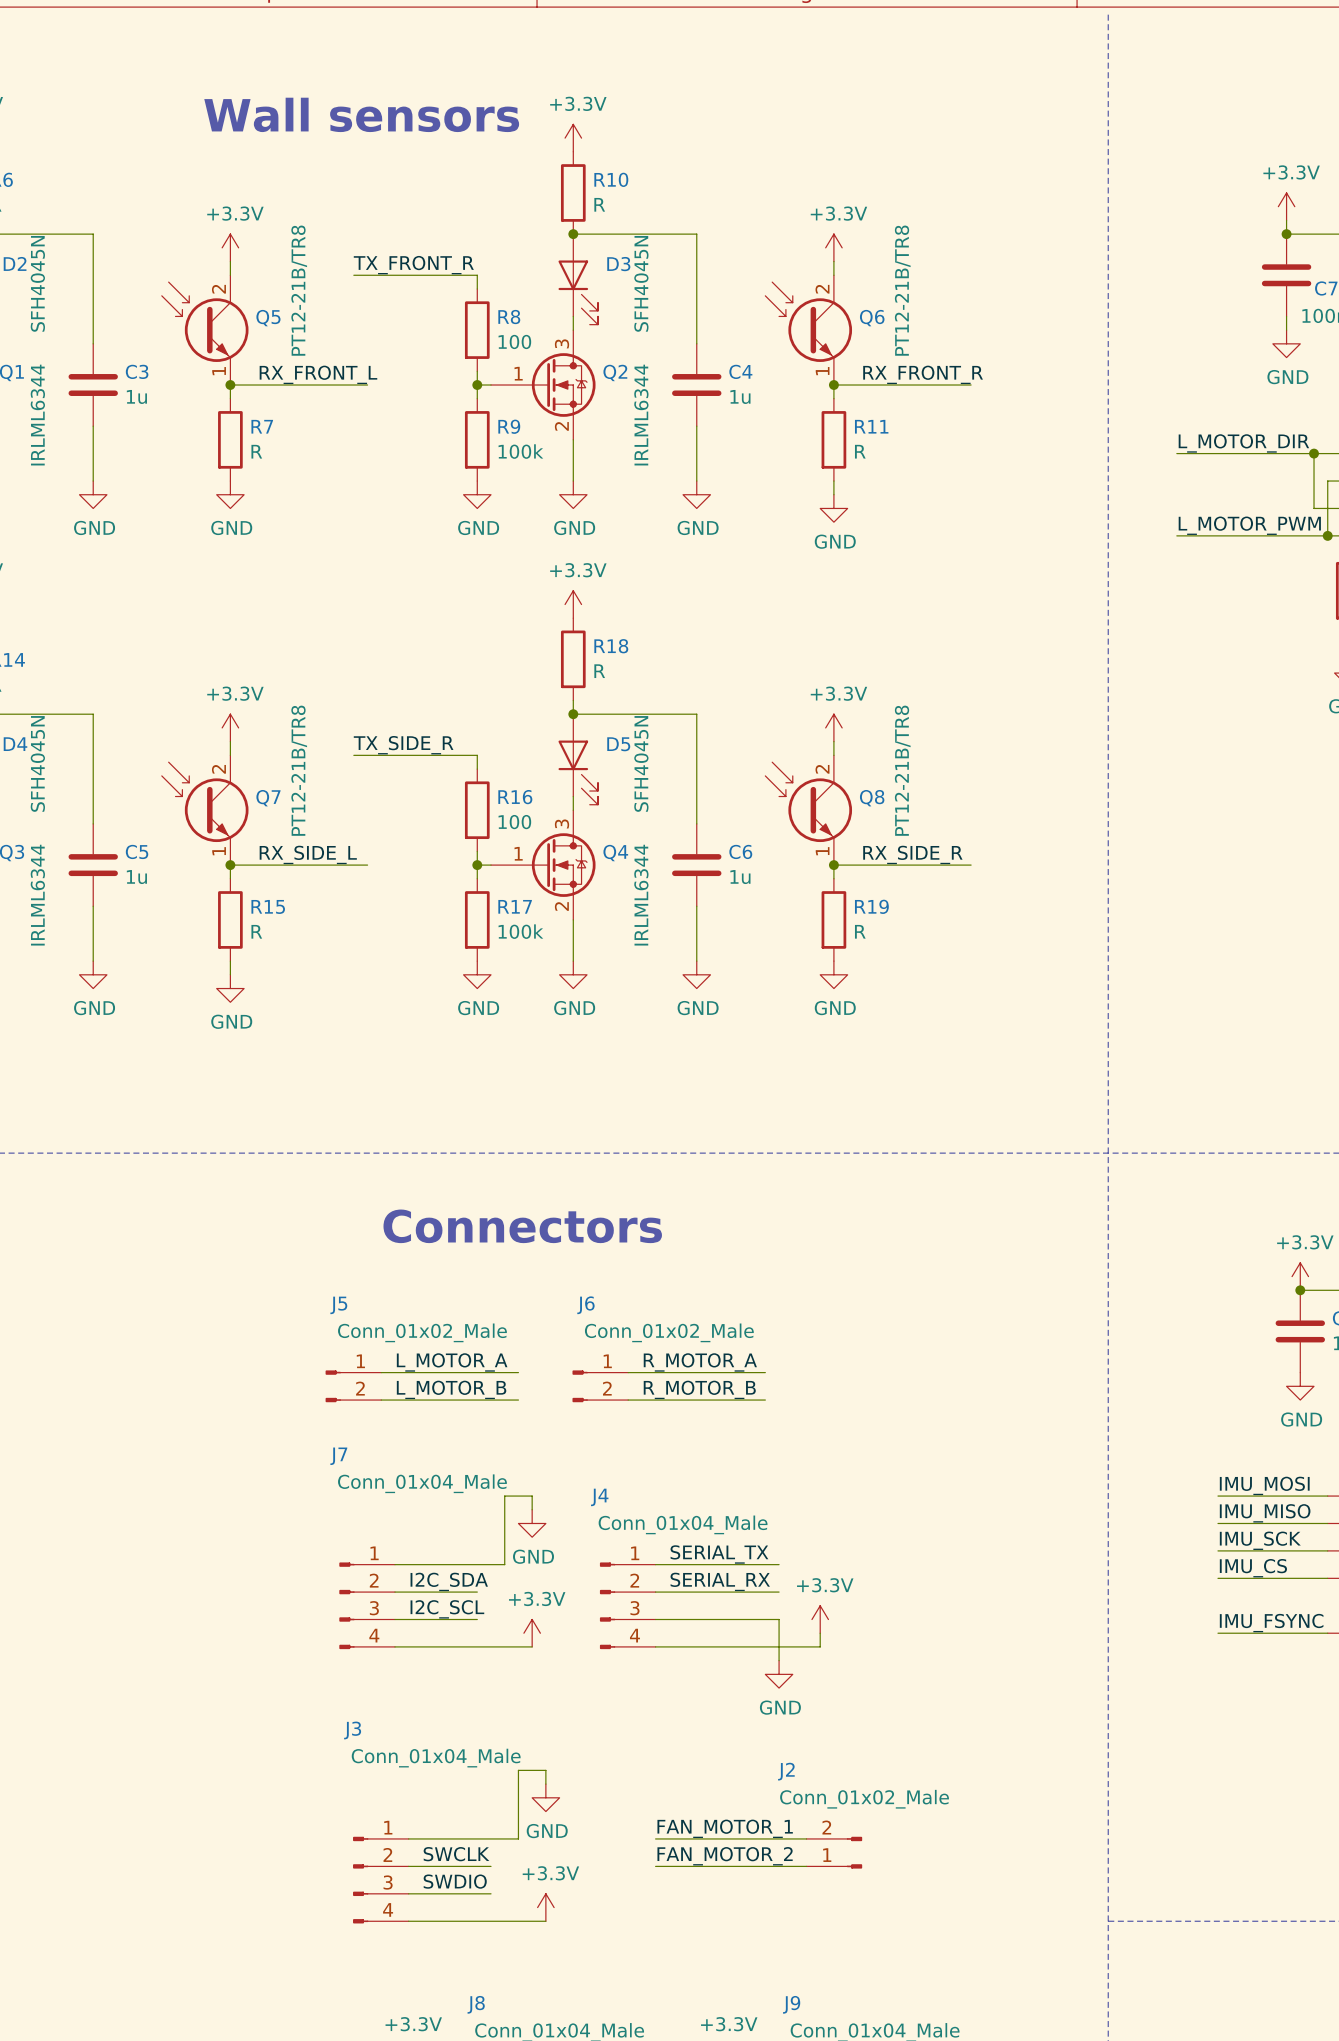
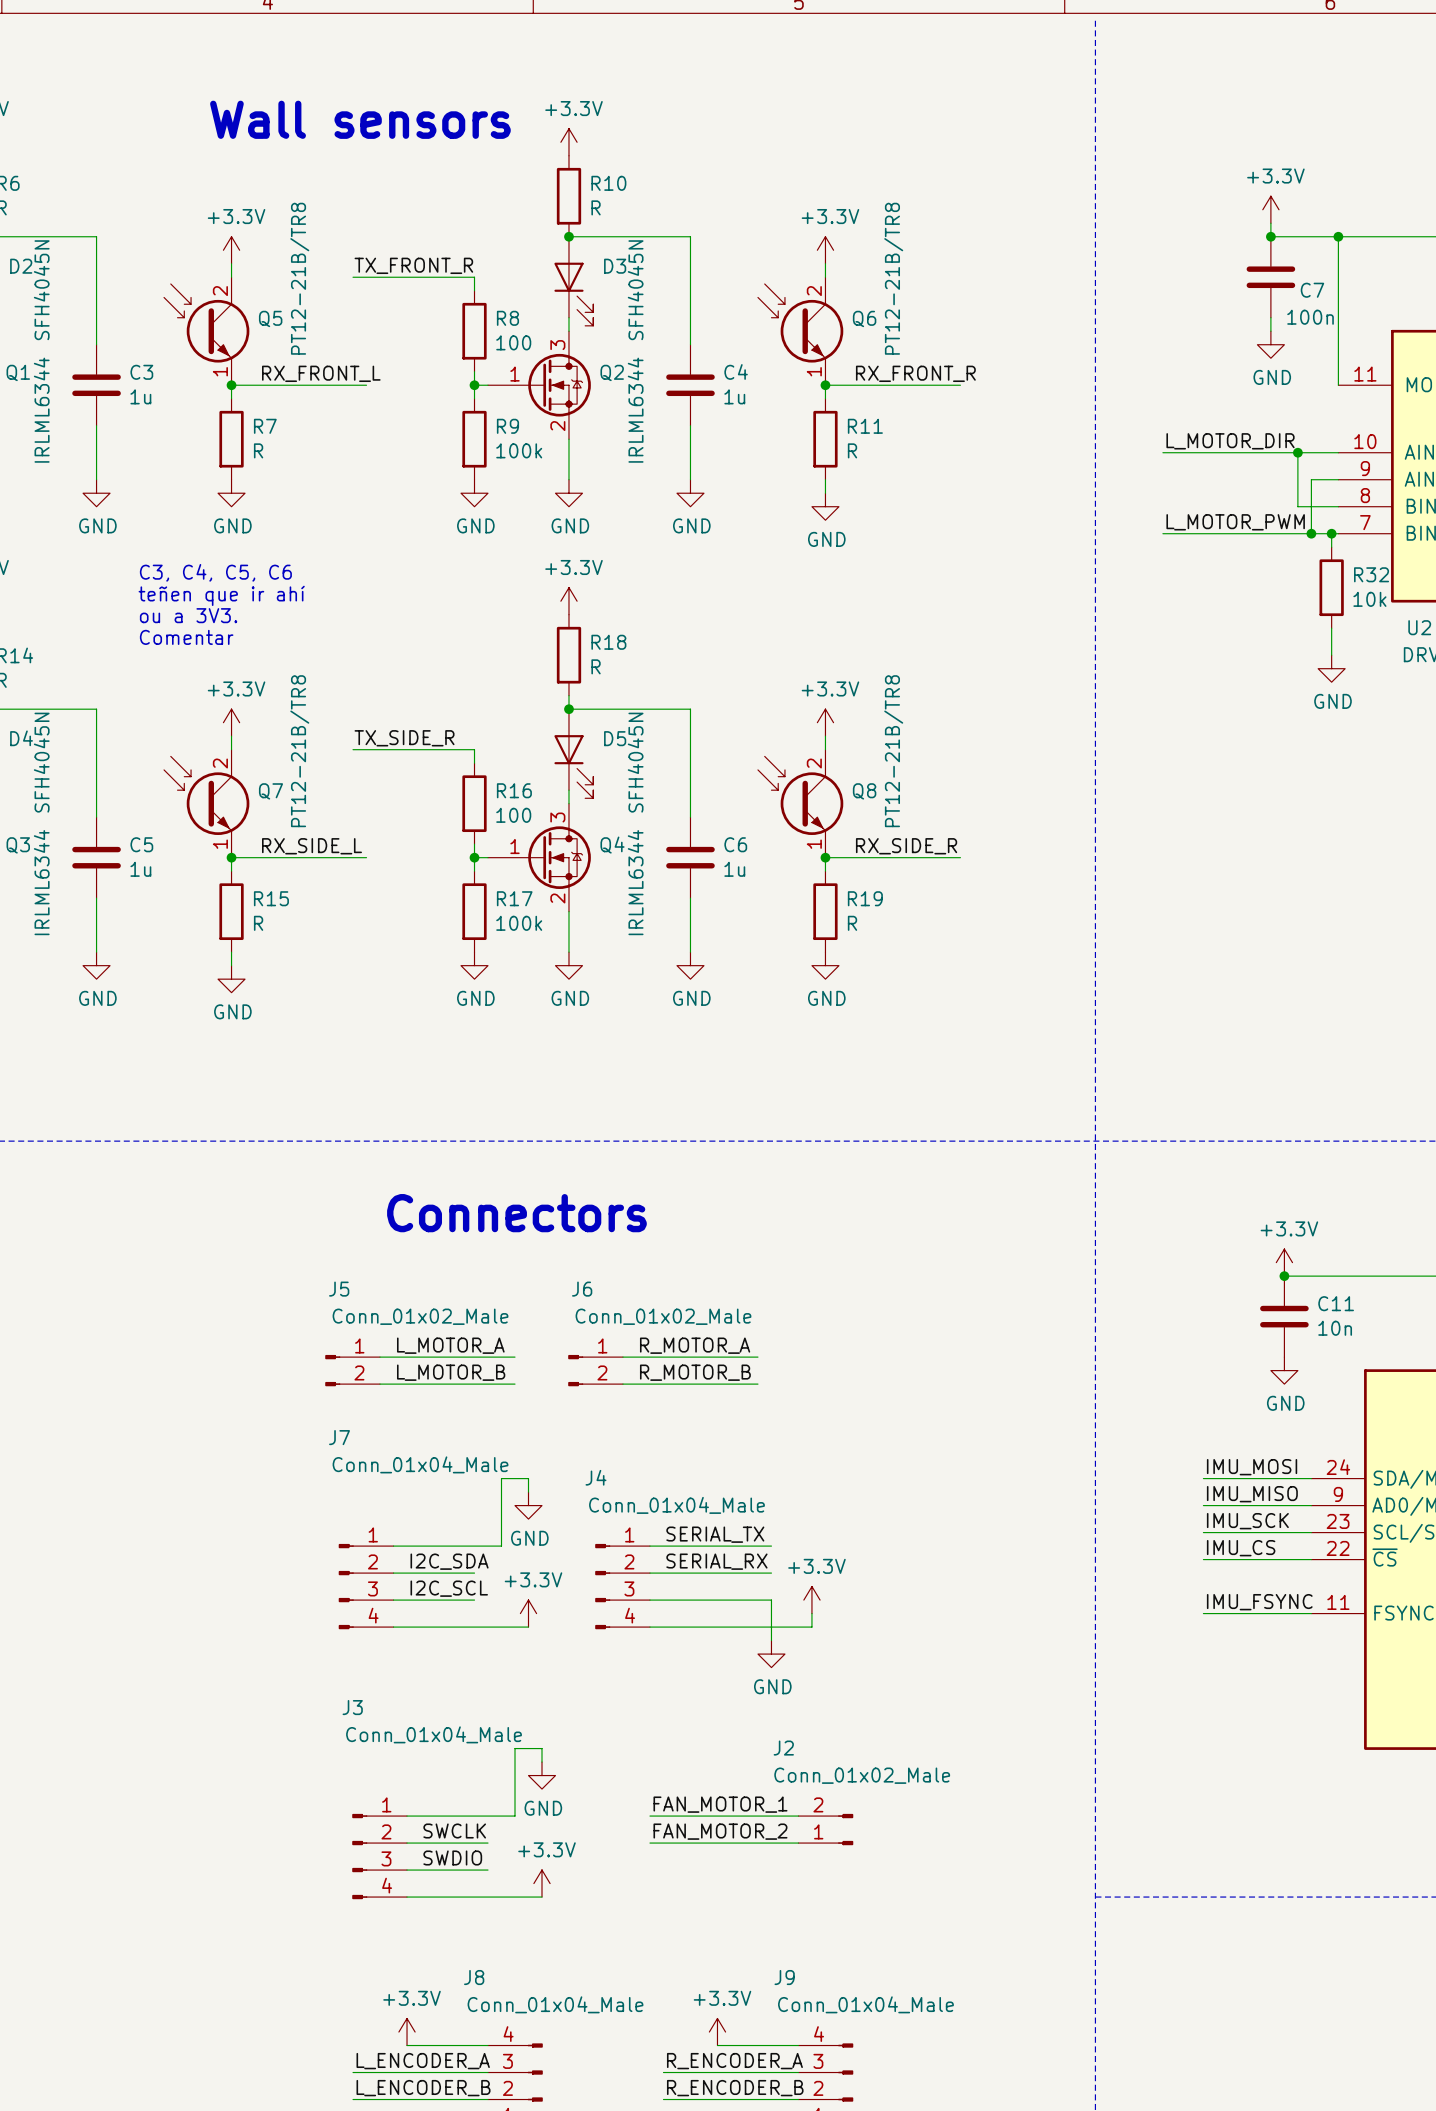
text: none -> C3, C4, C5, C6 (215, 572)
text: none -> teñen que ir ahí (221, 595)
text: none -> ou a 3V3. (188, 615)
text: none -> Comentar (186, 637)

